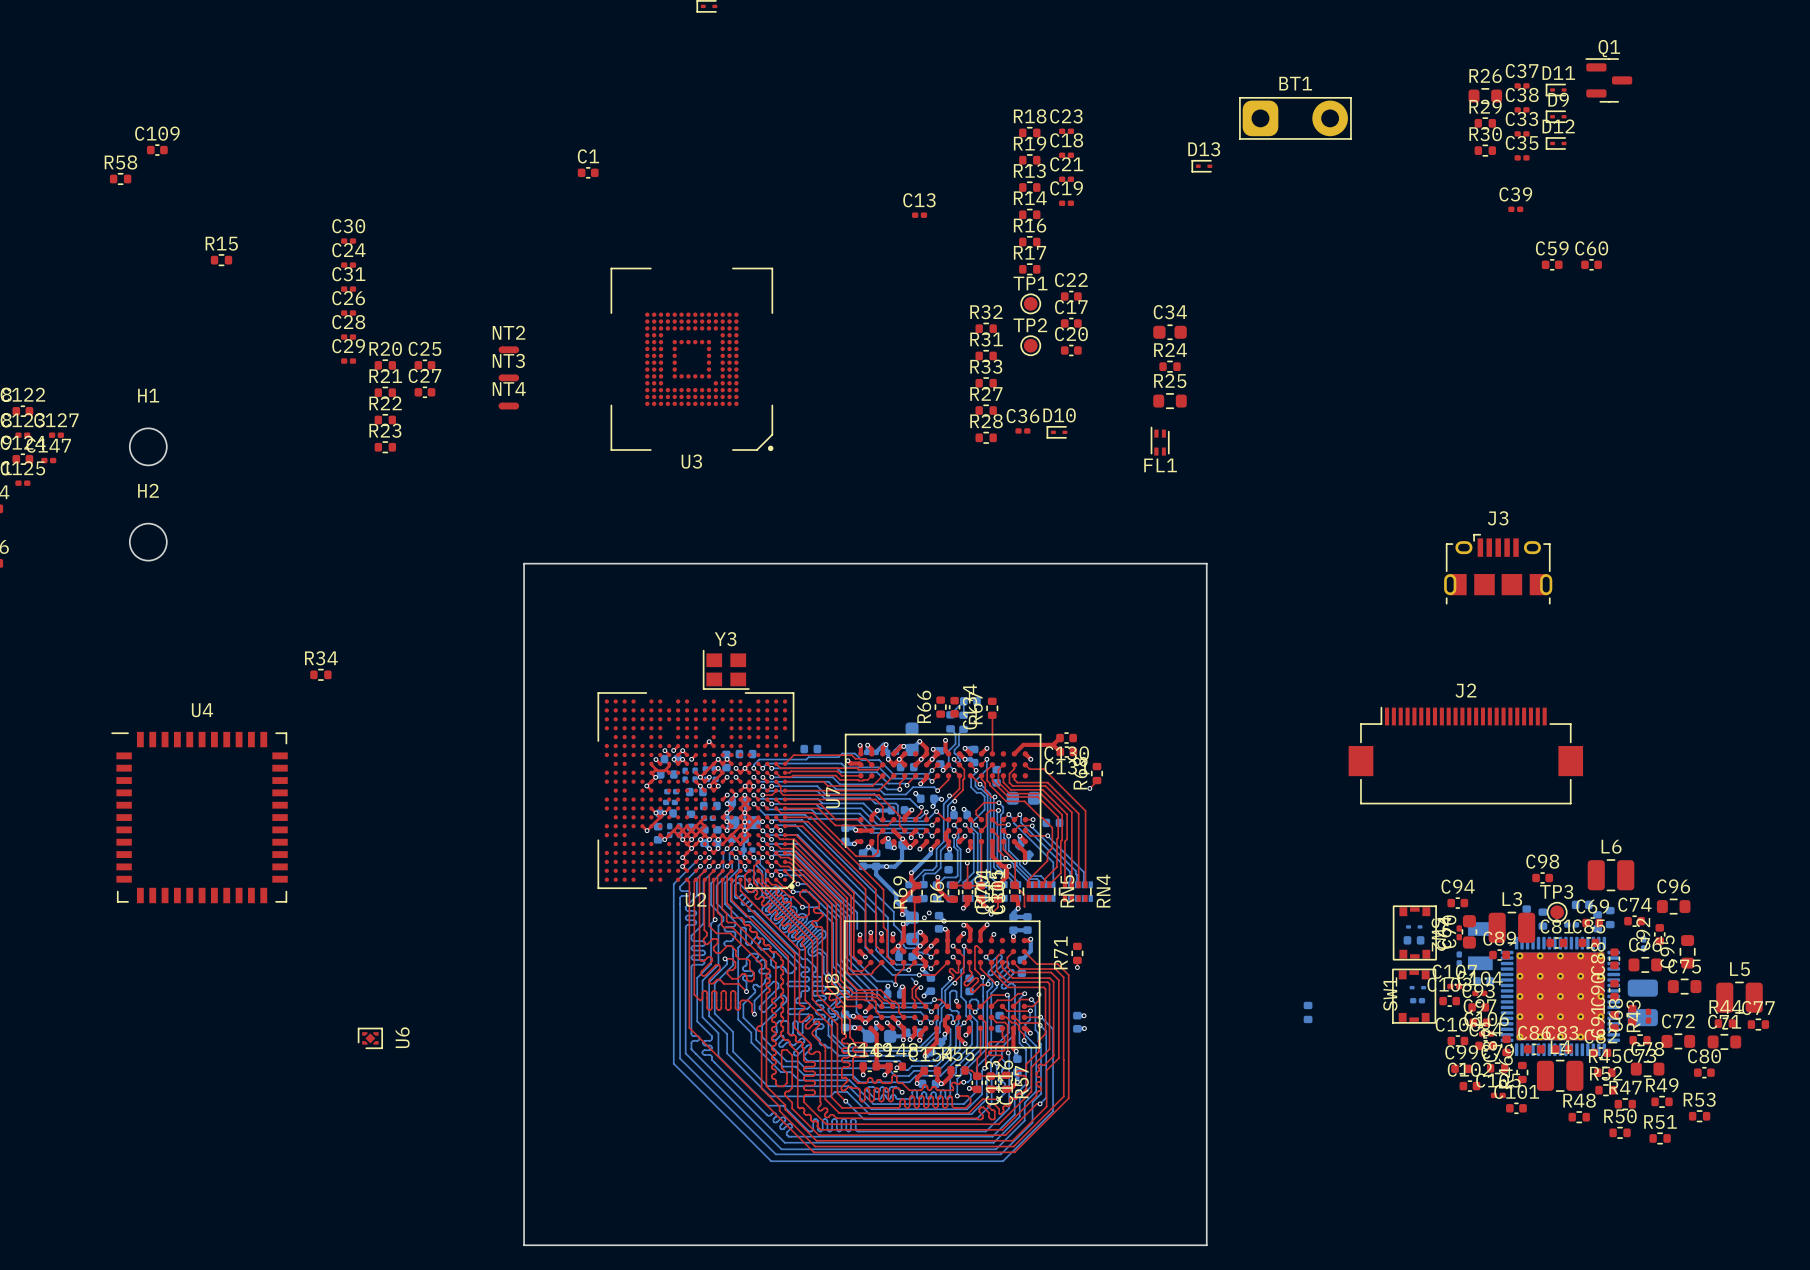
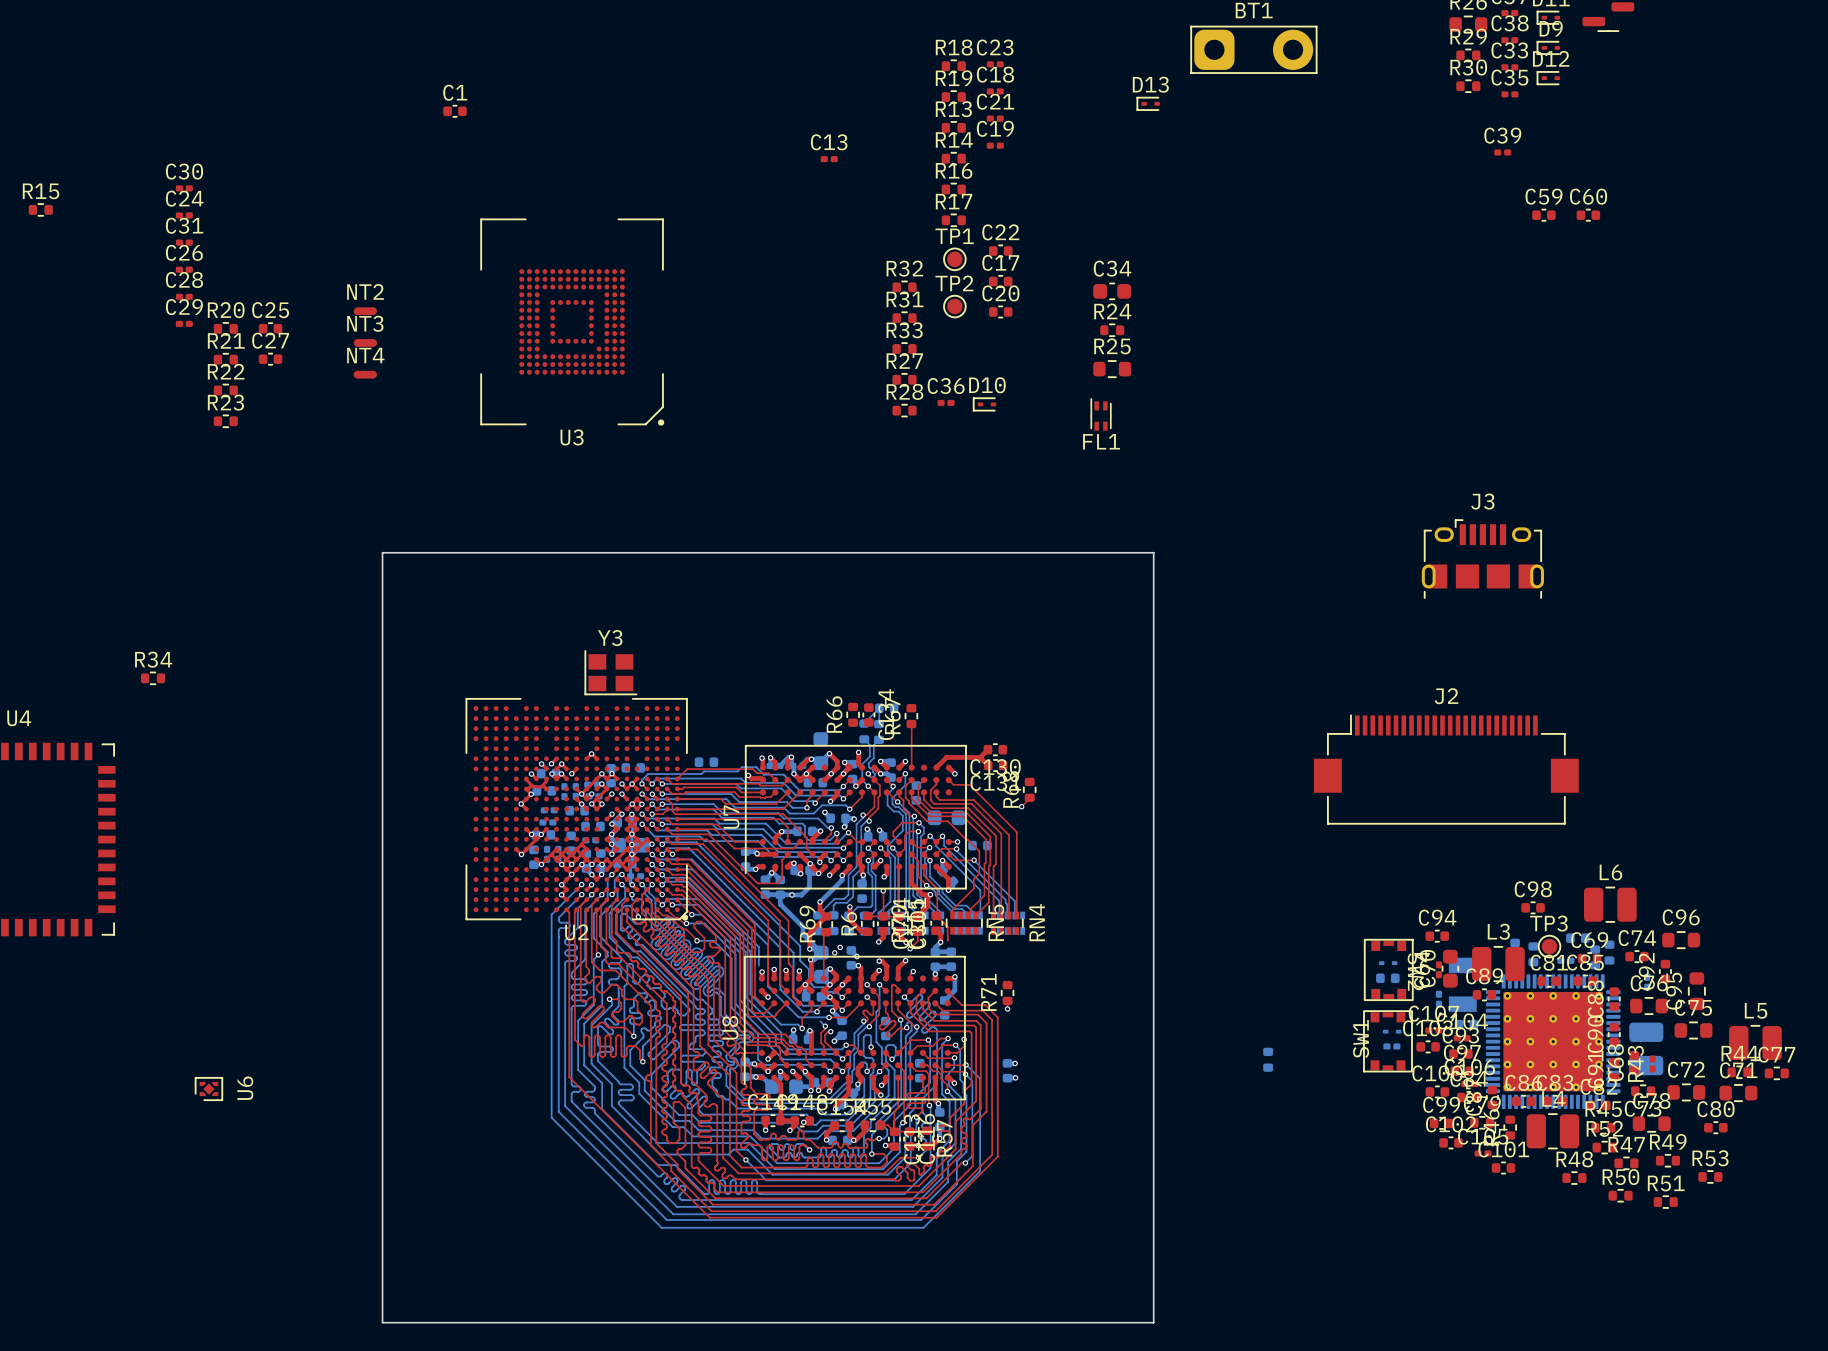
bottom track: (728, 970) (714, 983) -> (613, 1011) (612, 1014) (618, 1020) (618, 1023) (614, 1024) (608, 1018) (604, 1021) (612, 1030) (612, 1033) (609, 1034) (601, 1026) (598, 1026)
bottom track: (714, 998) (714, 1007) -> (597, 1043) (599, 1046) (611, 1046) (613, 1049) (611, 1051) (599, 1051) (597, 1054)
bottom track: (733, 1031) (733, 1050) -> (618, 1081) (620, 1084) (631, 1084) (633, 1087) (631, 1089) (620, 1090) (619, 1094) (631, 1095) (633, 1097) (632, 1100) (620, 1100) (618, 1103)

